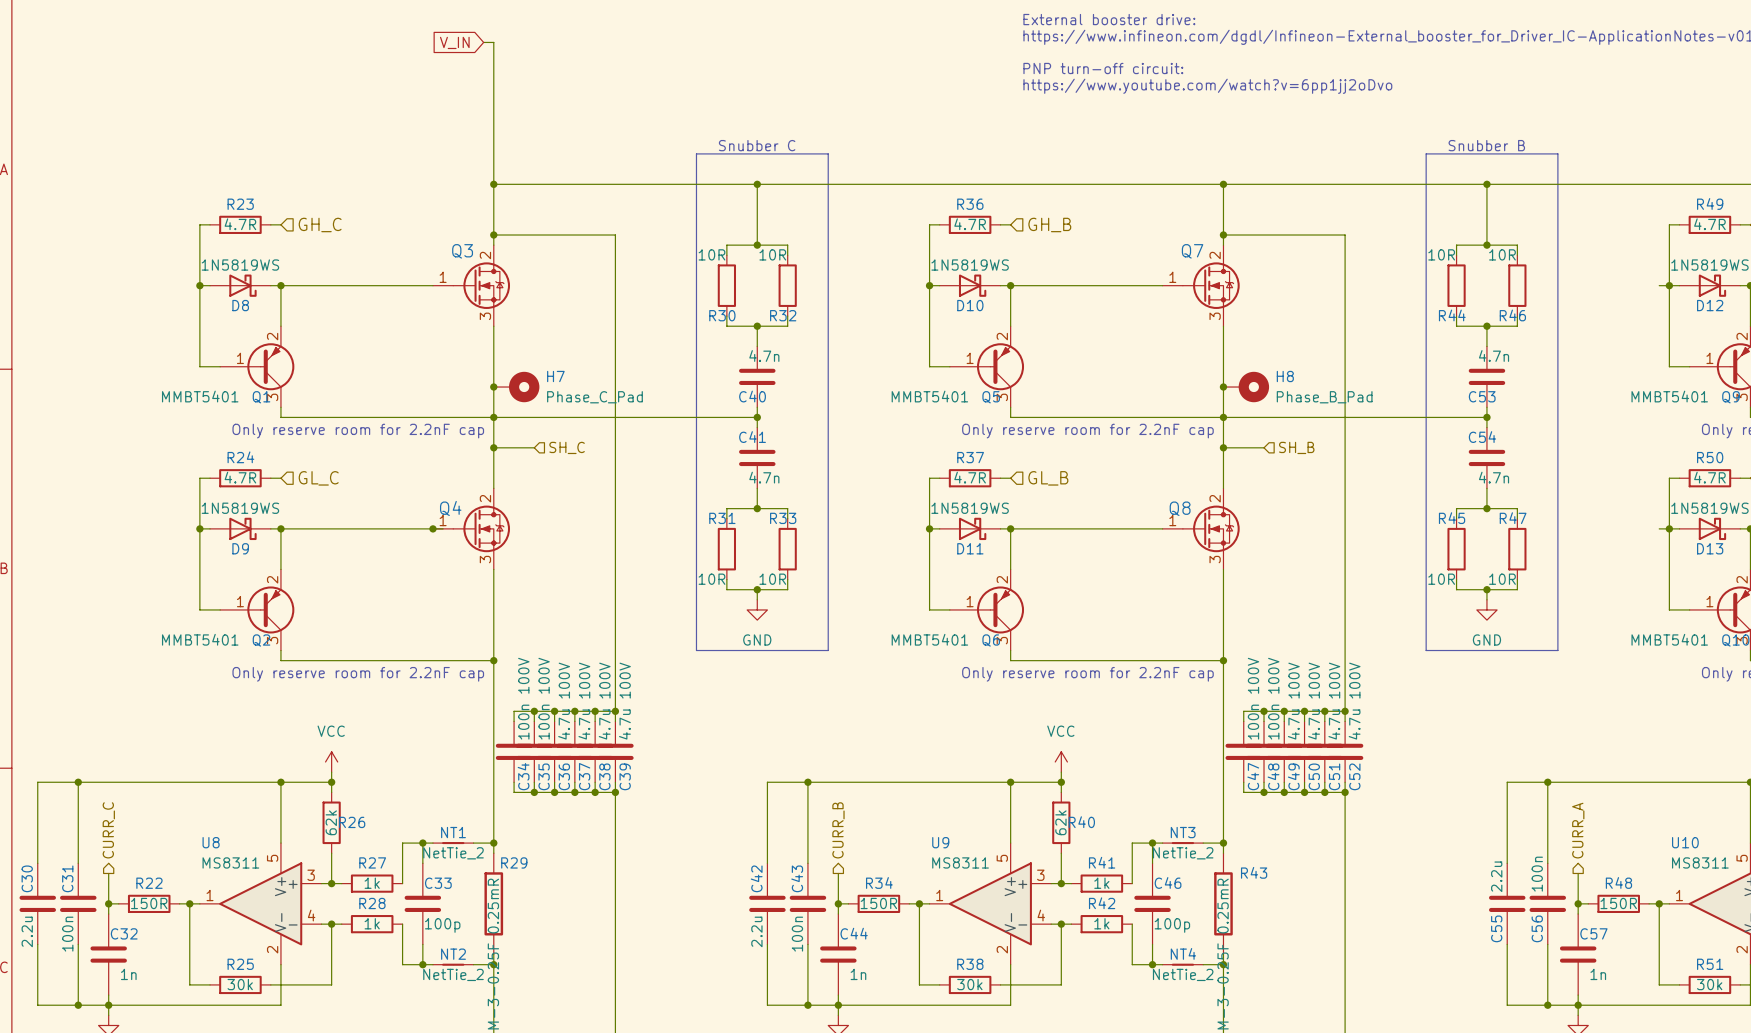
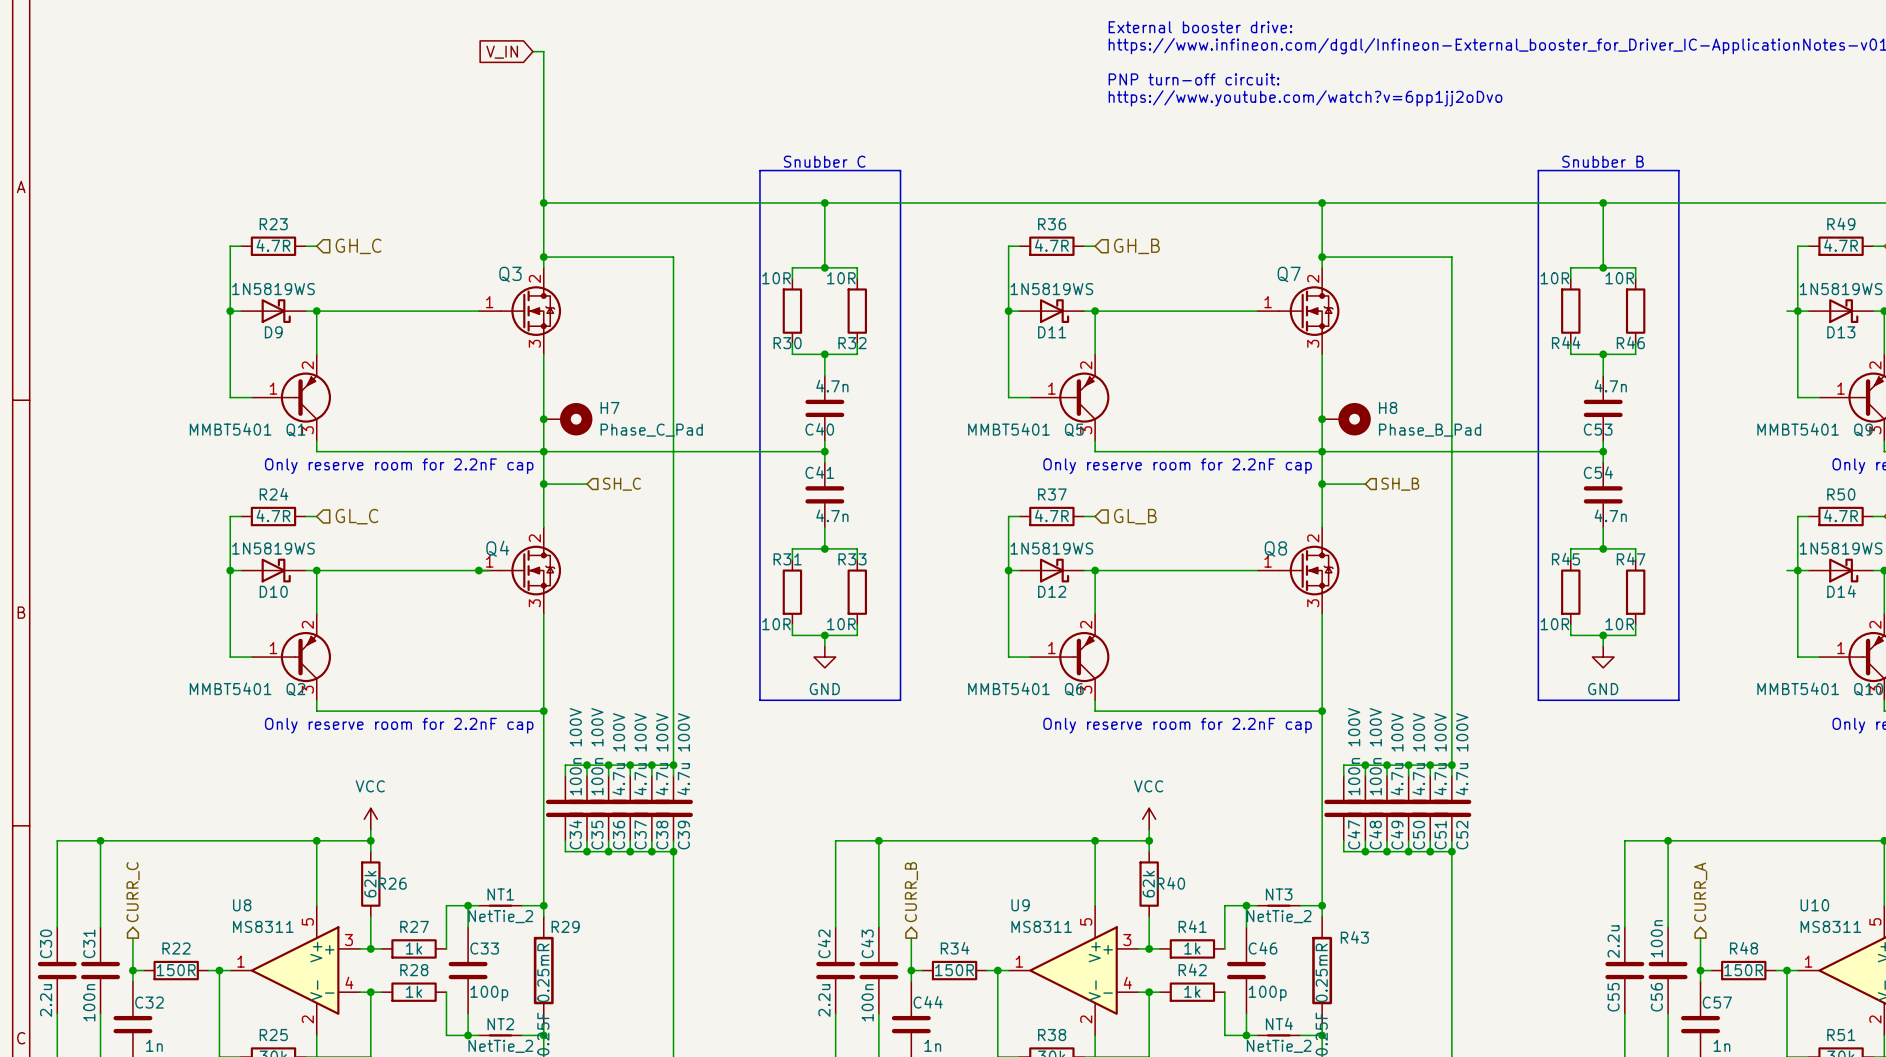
D8 name: D8 (240, 305) -> D9 (273, 332)
D10 name: D10 (970, 305) -> D11 (1052, 332)
D12 name: D12 (1710, 305) -> D13 (1841, 332)
D9 name: D9 (240, 548) -> D10 (273, 591)
D11 name: D11 (970, 548) -> D12 (1052, 591)
D13 name: D13 (1710, 548) -> D14 (1841, 591)

